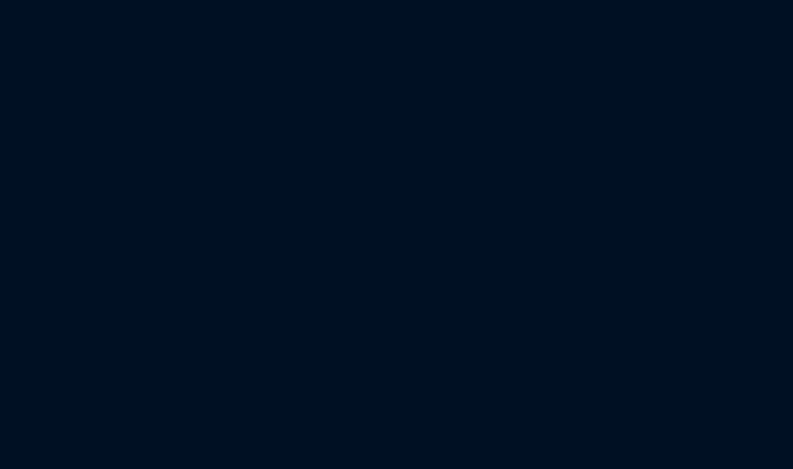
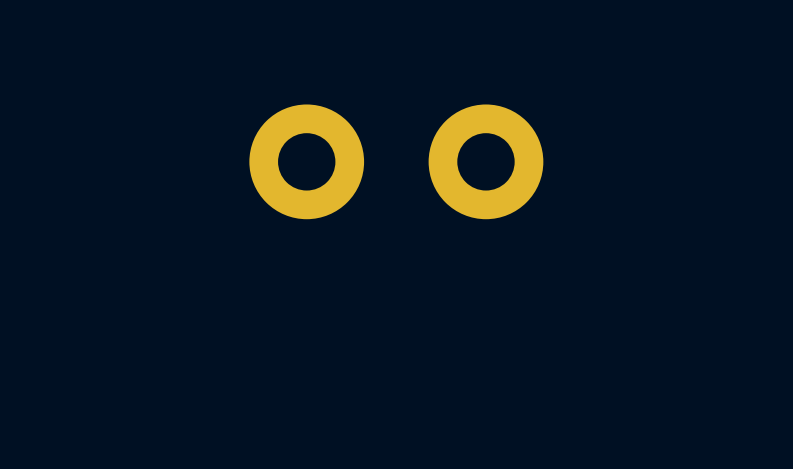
part: none -> (396, 161)

